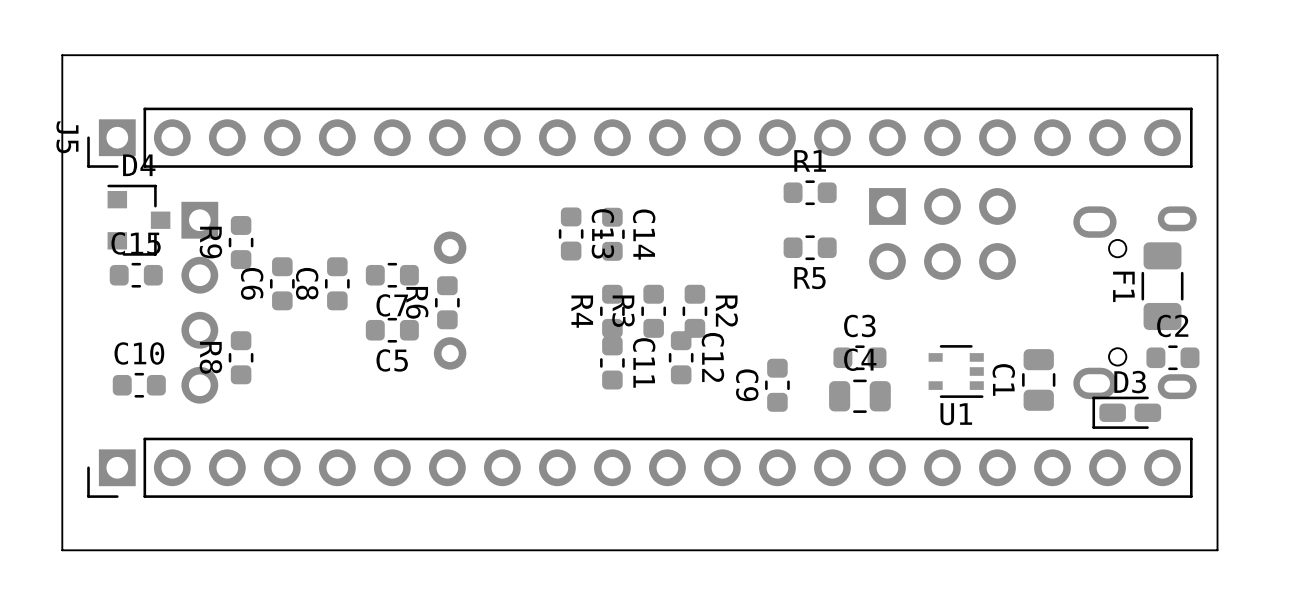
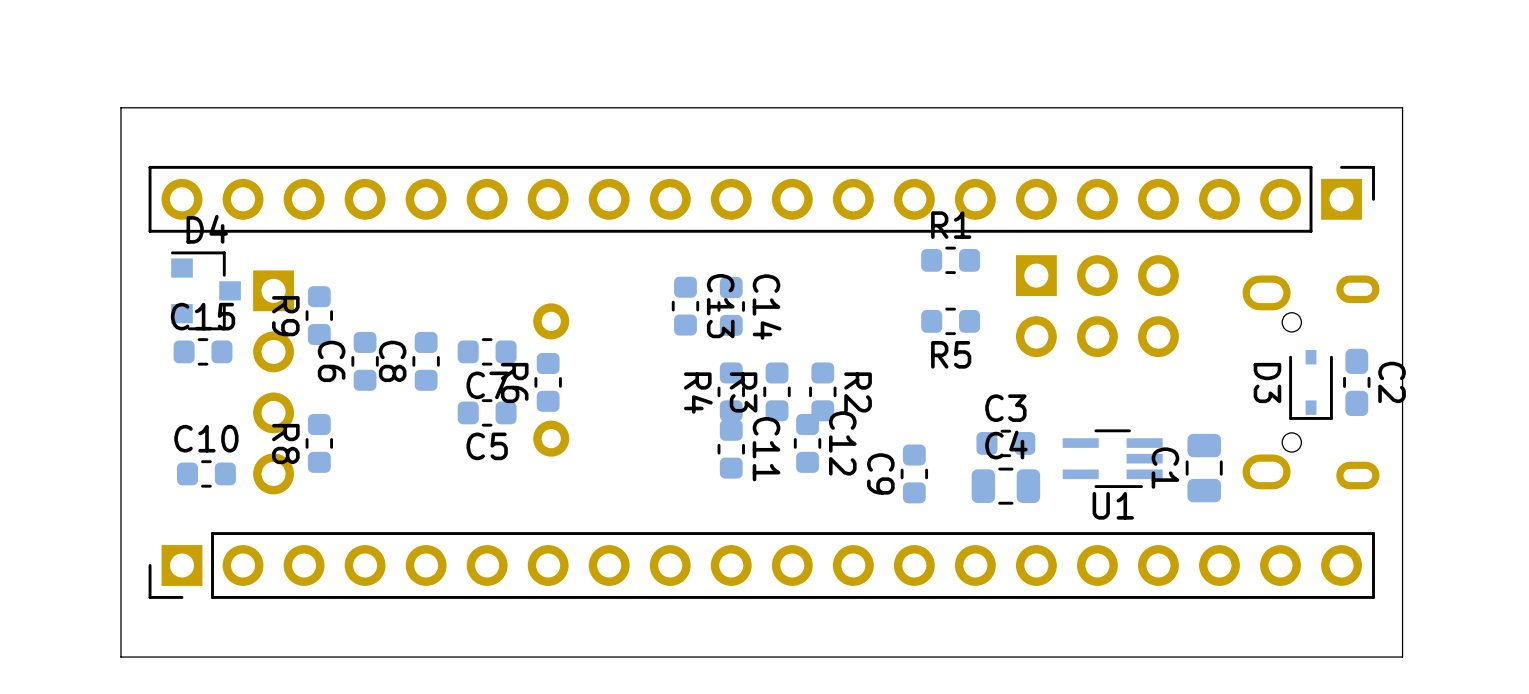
J5: (639, 137) -> none
part: none -> (761, 199)
F1: (1162, 286) -> none
C2 name position: C2 (1172, 325) -> C2 (1392, 382)
U1 footprint: [928, 345, 984, 398] -> [1062, 429, 1163, 489]
C2 footprint: [1146, 345, 1200, 371] -> [1343, 348, 1371, 417]
D3 name position: D3 (1130, 382) -> D3 (1267, 382)
D3 footprint: [1092, 396, 1162, 429] -> [1289, 349, 1333, 420]

